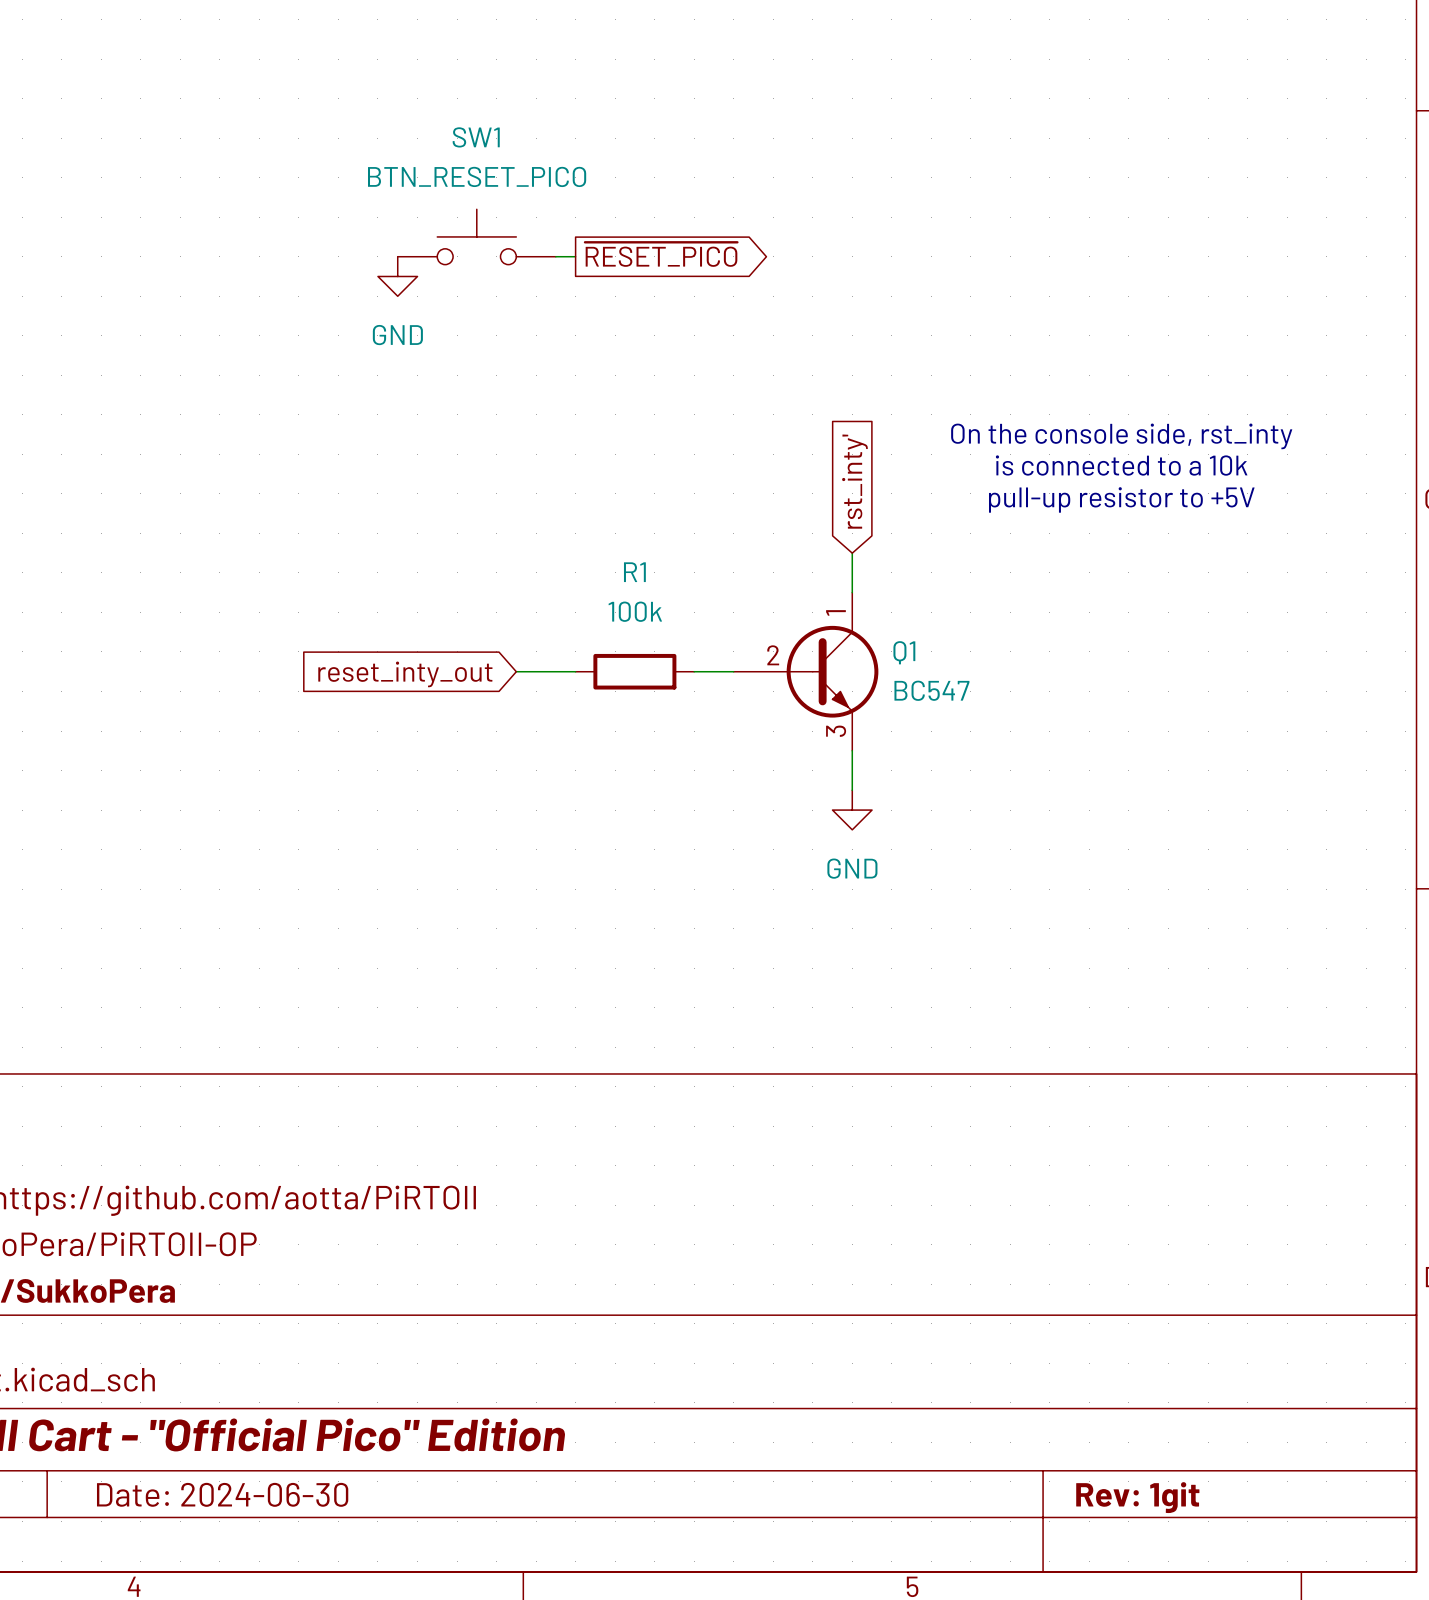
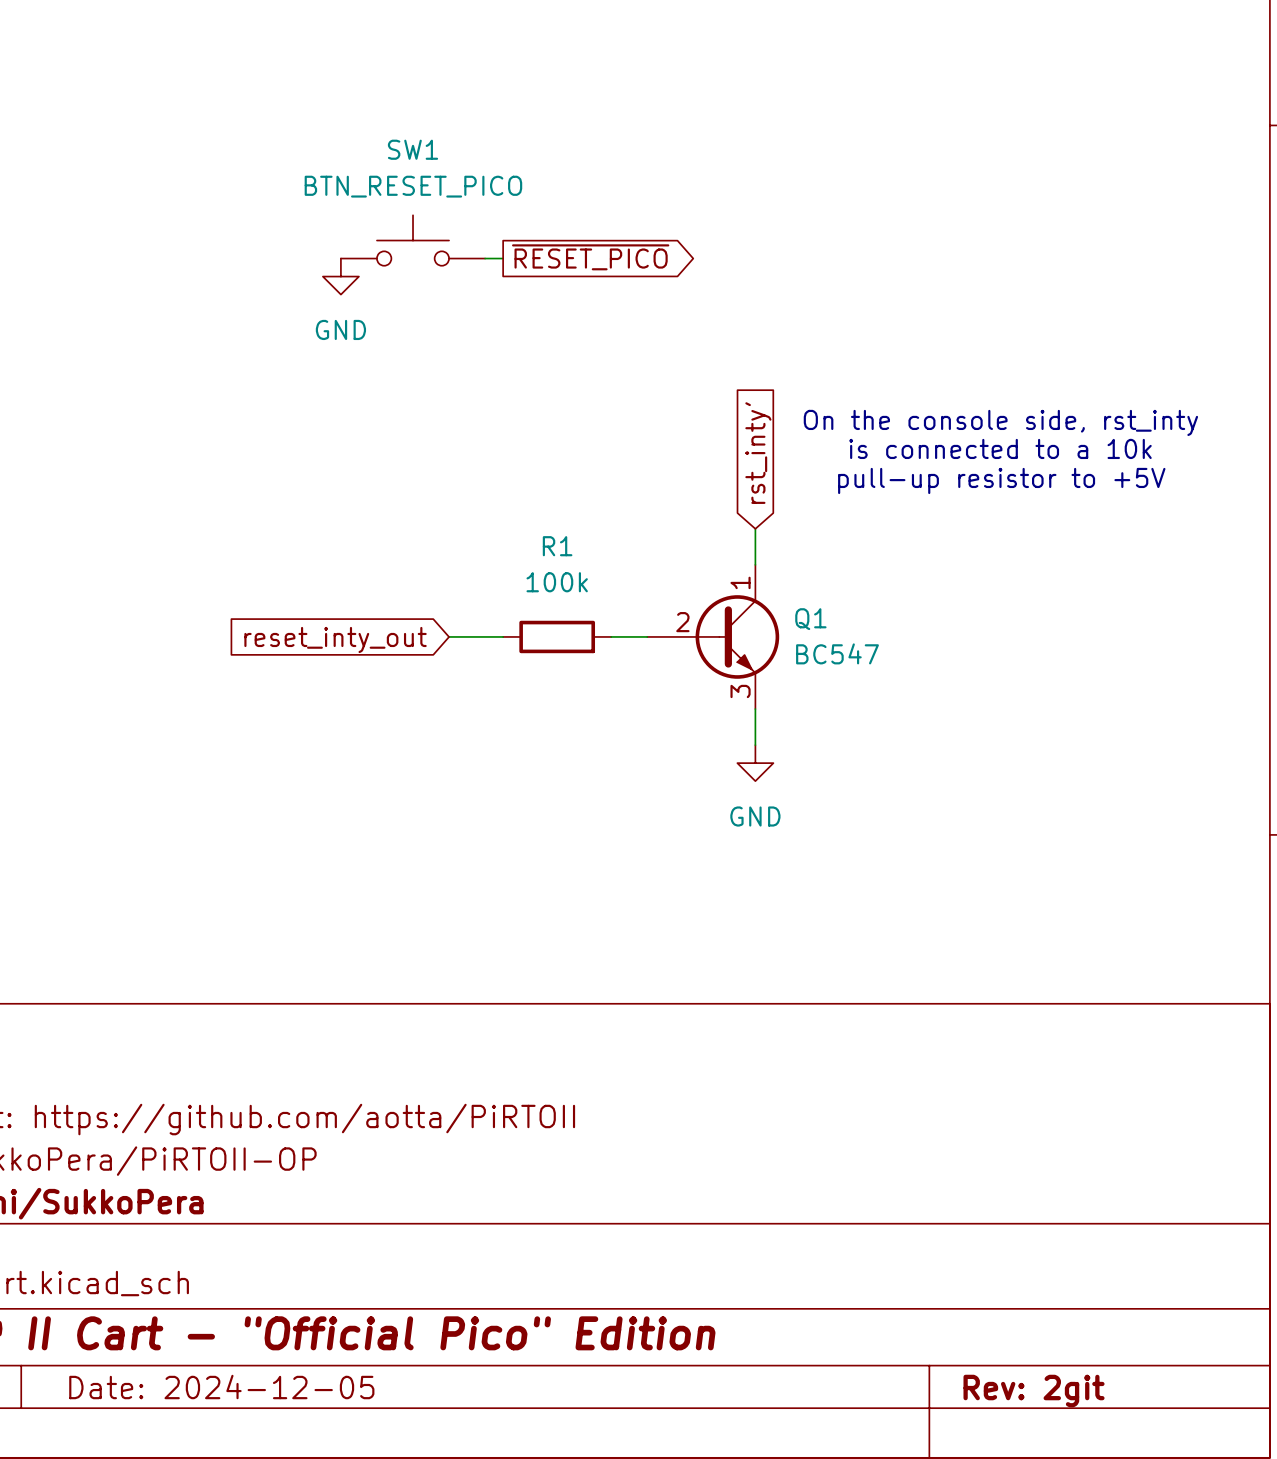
title block: Date: 2024-06-30 (222, 1494) -> Date: 2024-12-05 (221, 1387)
title block: Rev: 1git (1137, 1497) -> Rev: 2git (1034, 1391)

